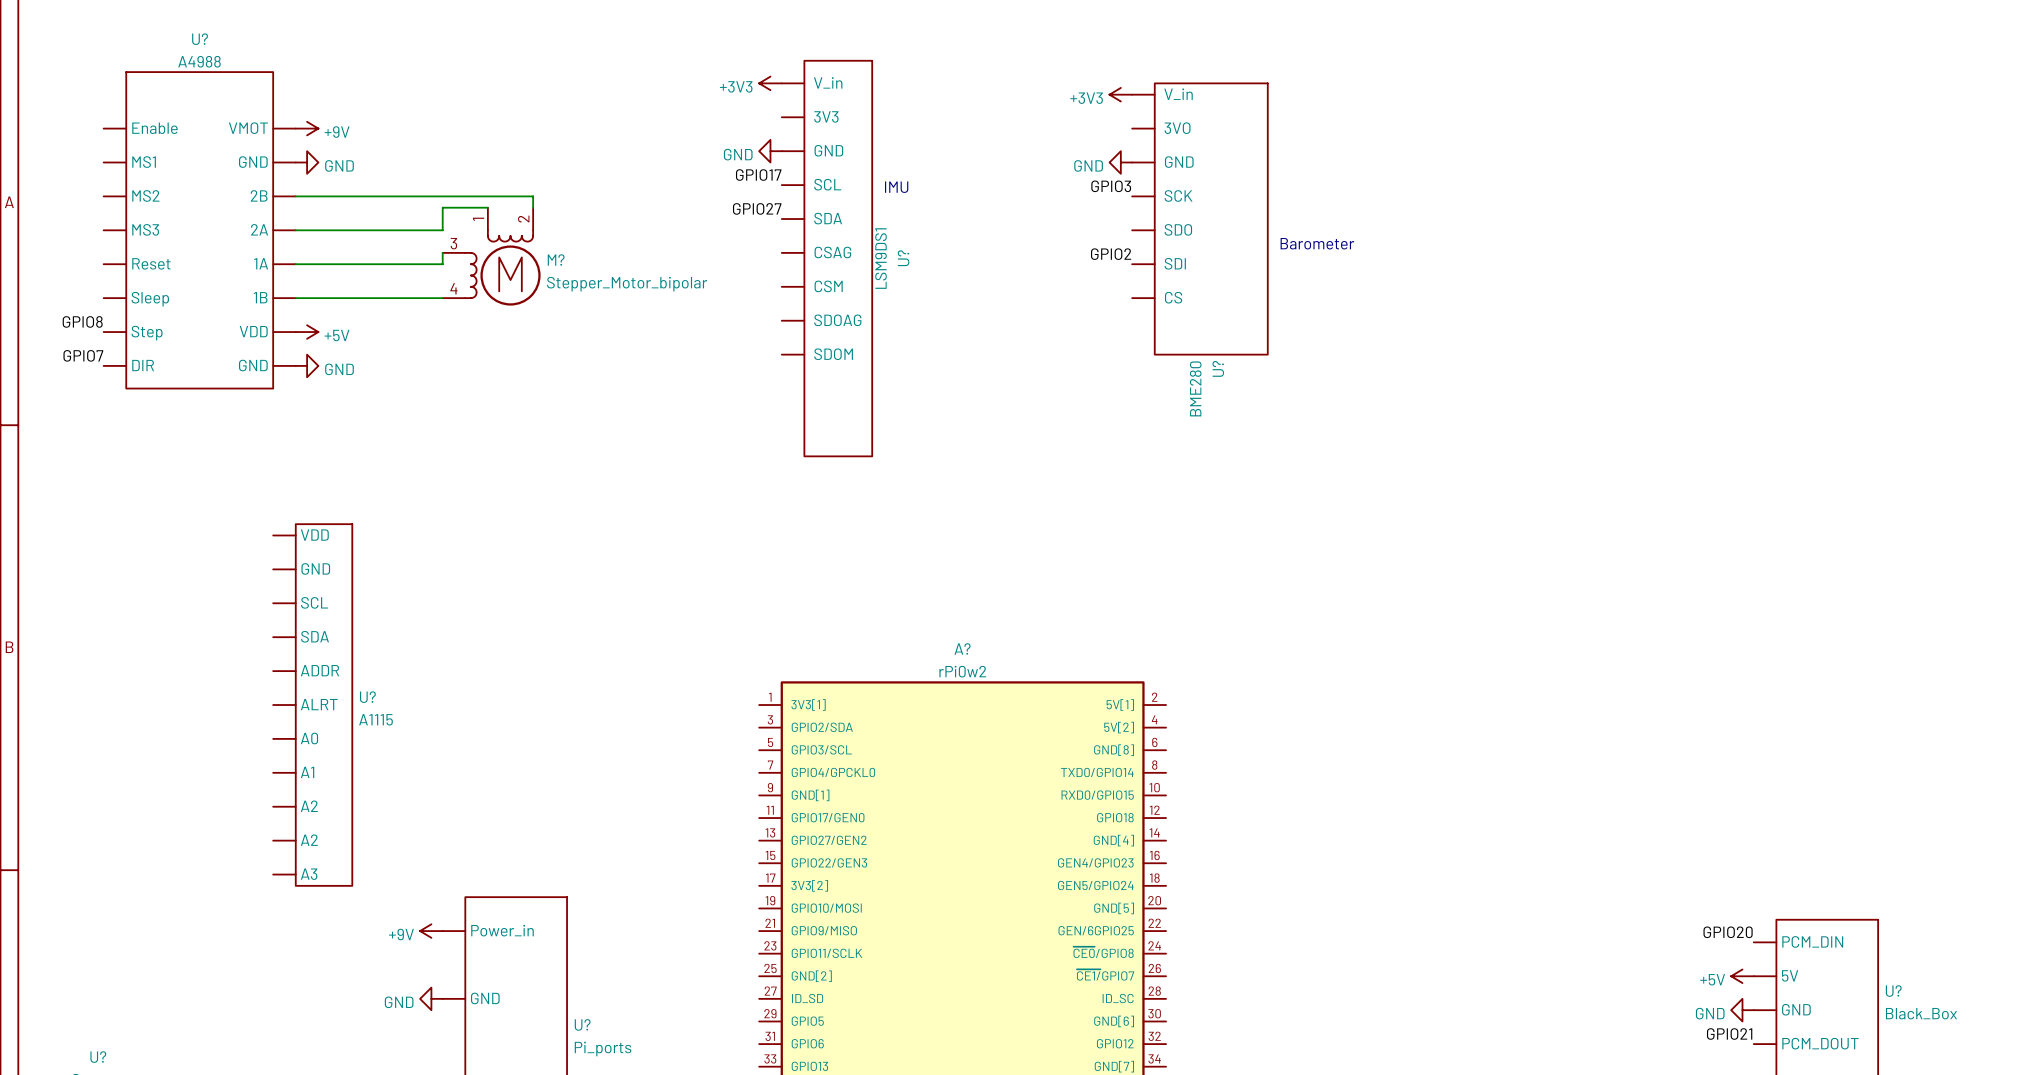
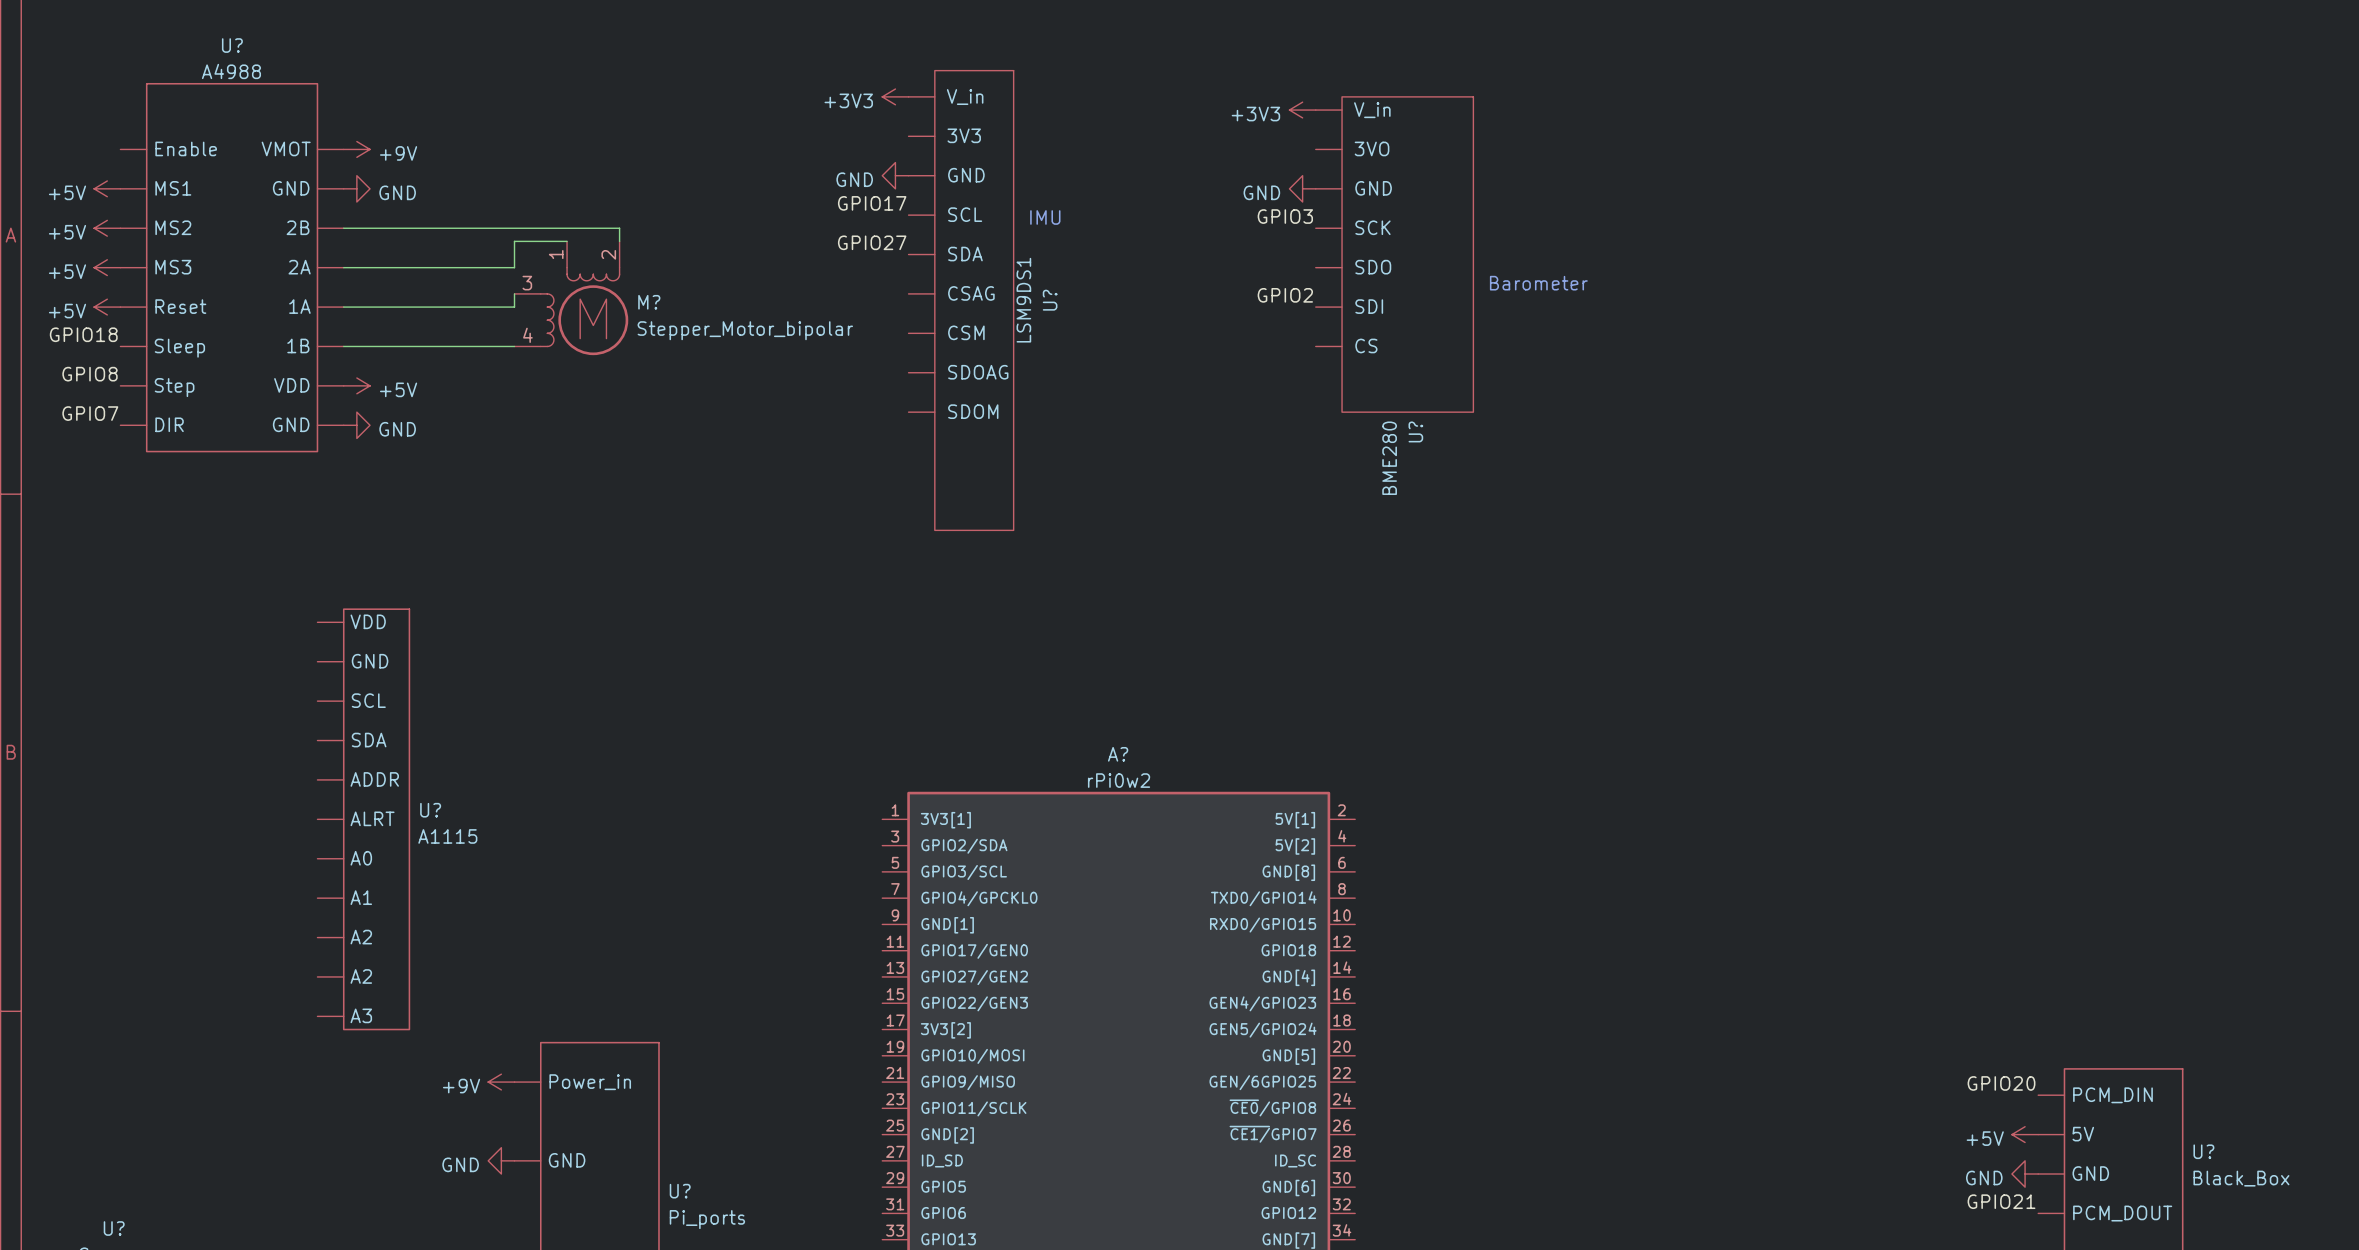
power symbol: none -> +5V (107, 188)
power symbol: none -> +5V (107, 228)
power symbol: none -> +5V (107, 267)
power symbol: none -> +5V (107, 307)
label: none -> GPIO18 (83, 334)

